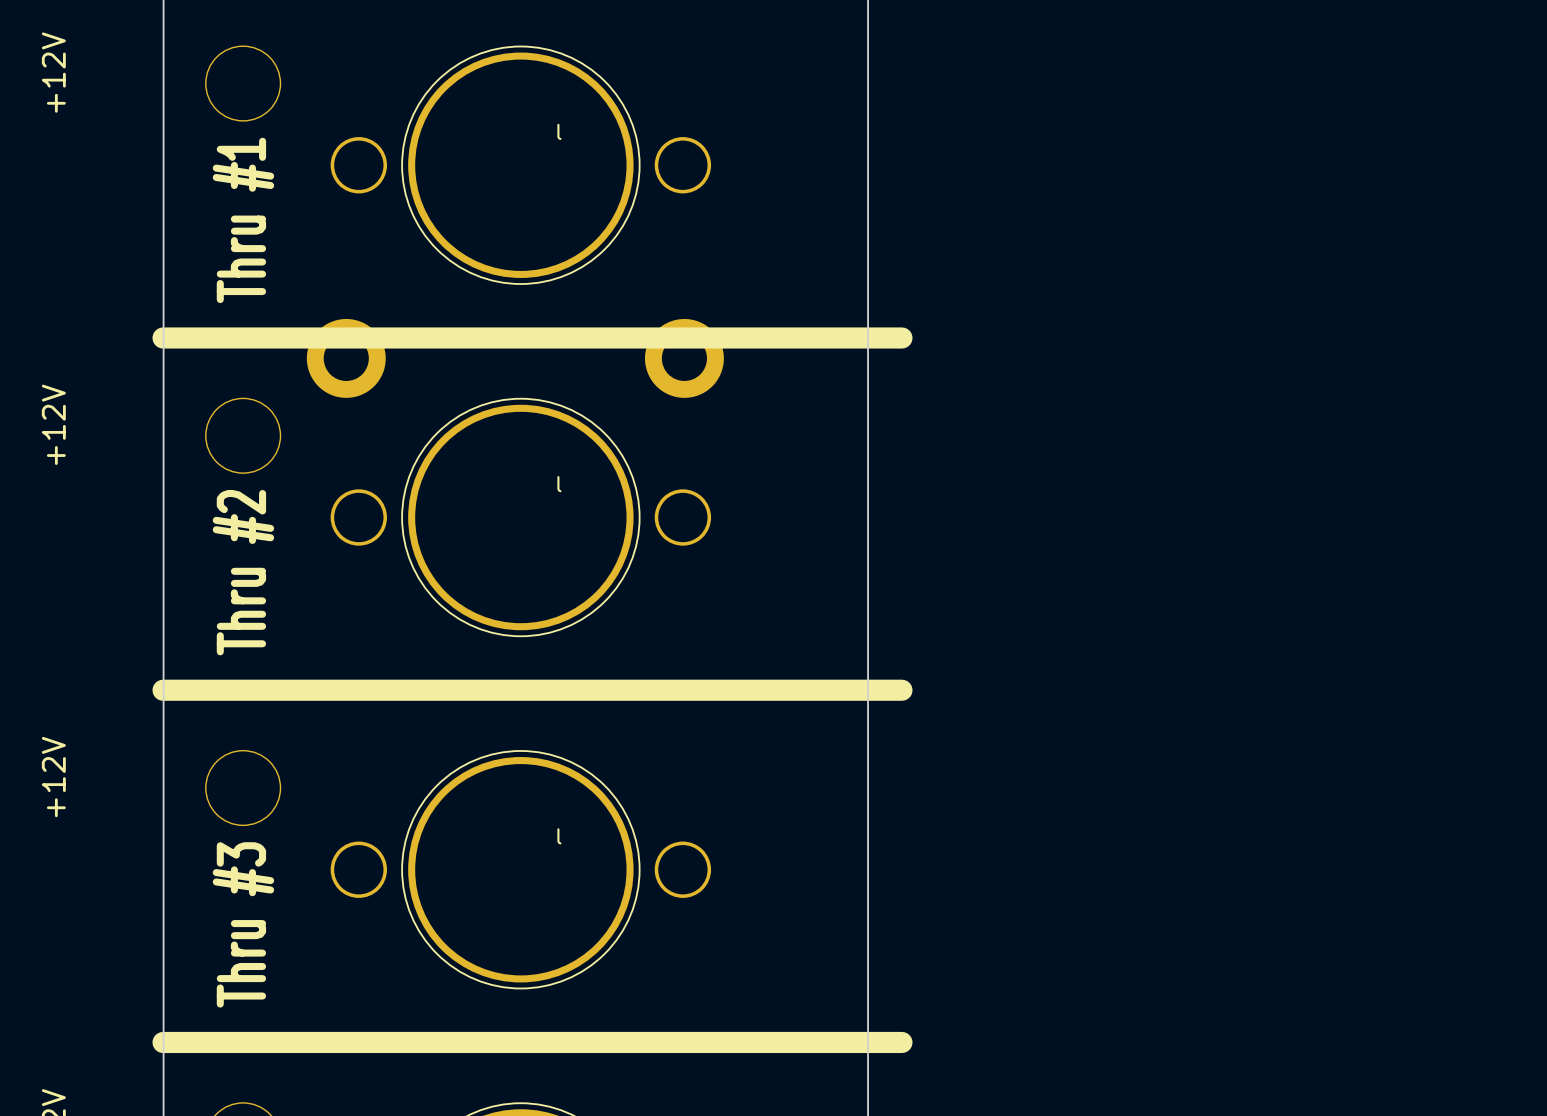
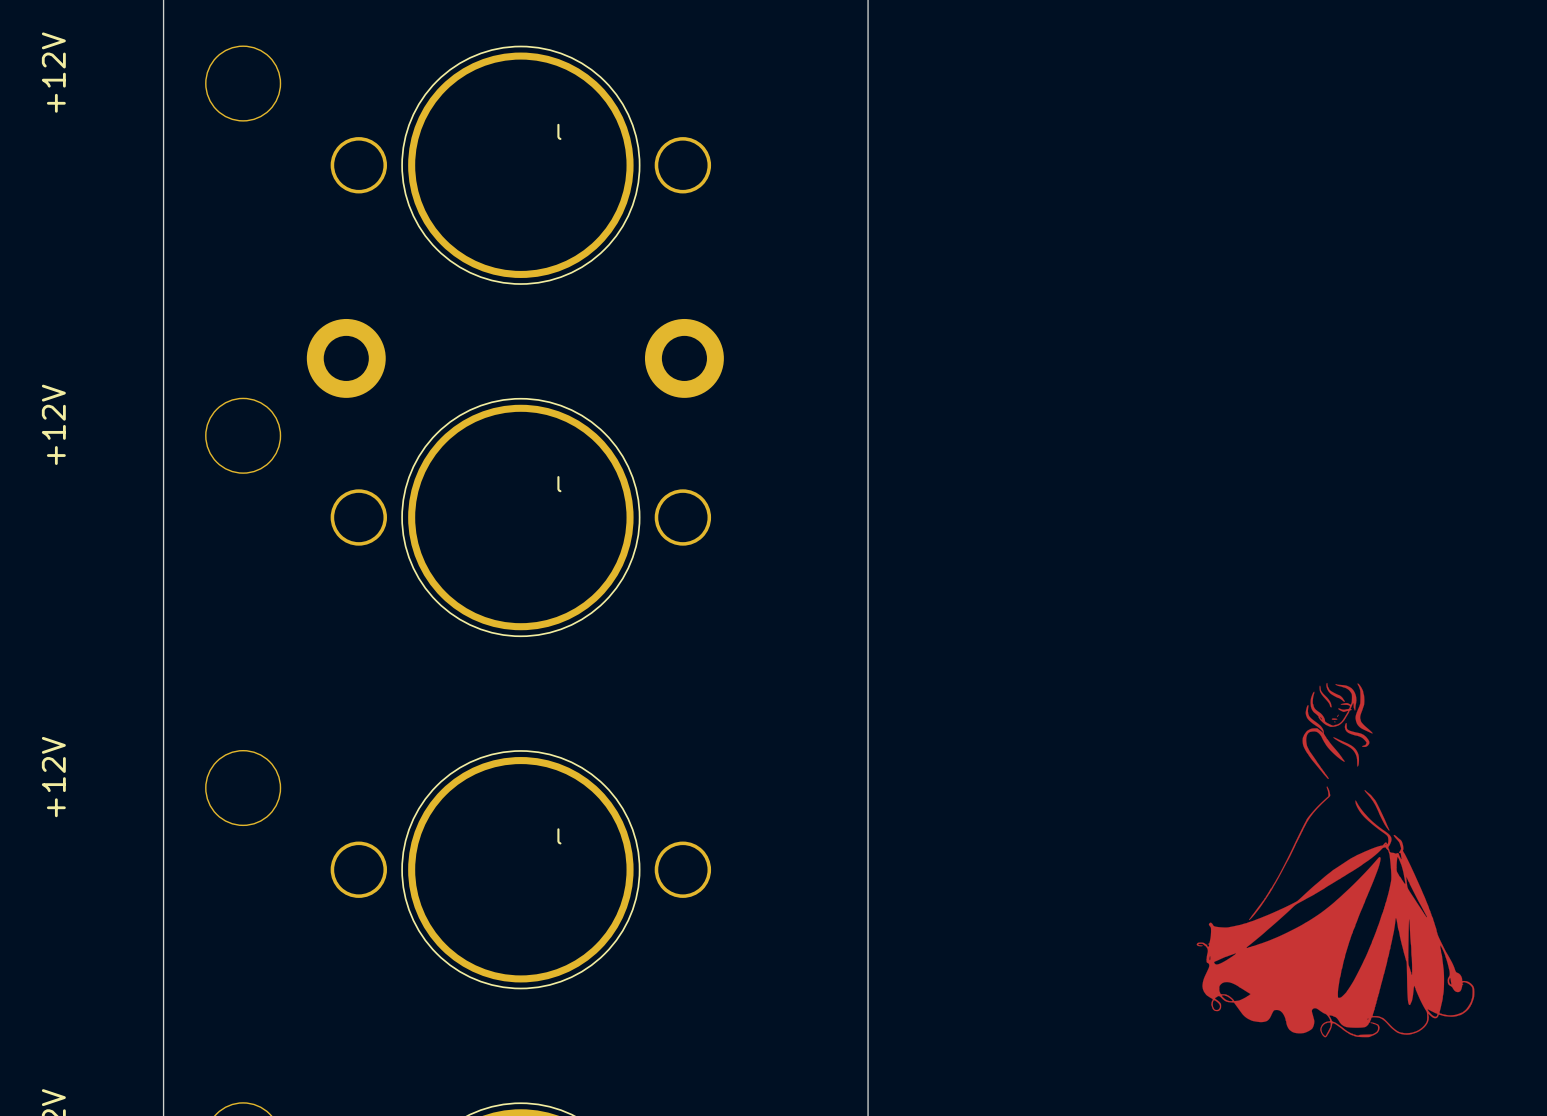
text: Thru #1 (243, 220) -> none
line: (163, 338) (901, 338) -> none
text: Thru #2 (243, 572) -> none
drawing: none -> [1196, 682, 1475, 1038]
line: (163, 690) (901, 690) -> none
text: Thru #3 (243, 924) -> none
line: (163, 1042) (901, 1042) -> none

